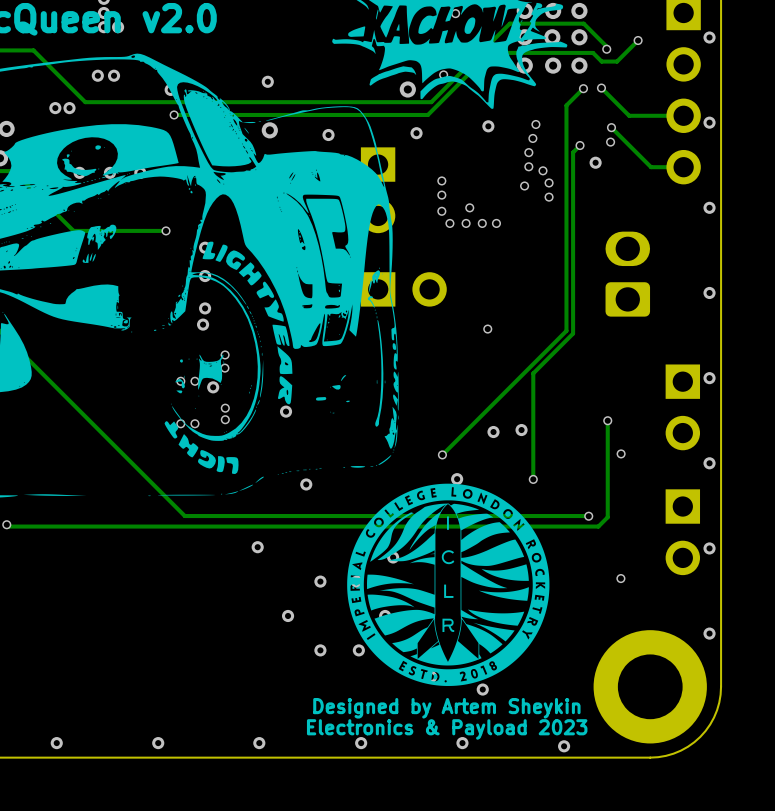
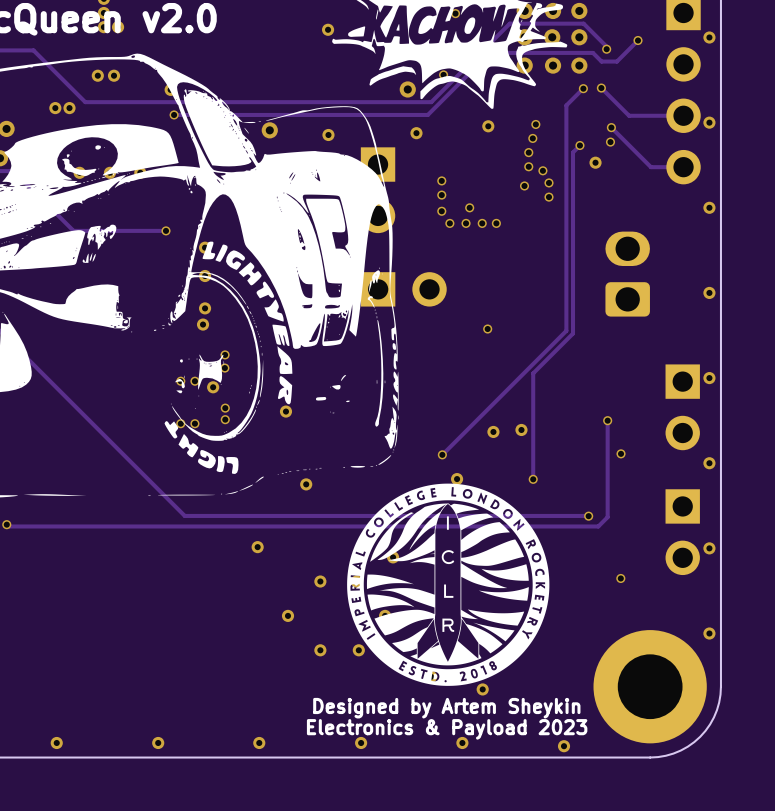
via position: (267, 81) -> (328, 29)

